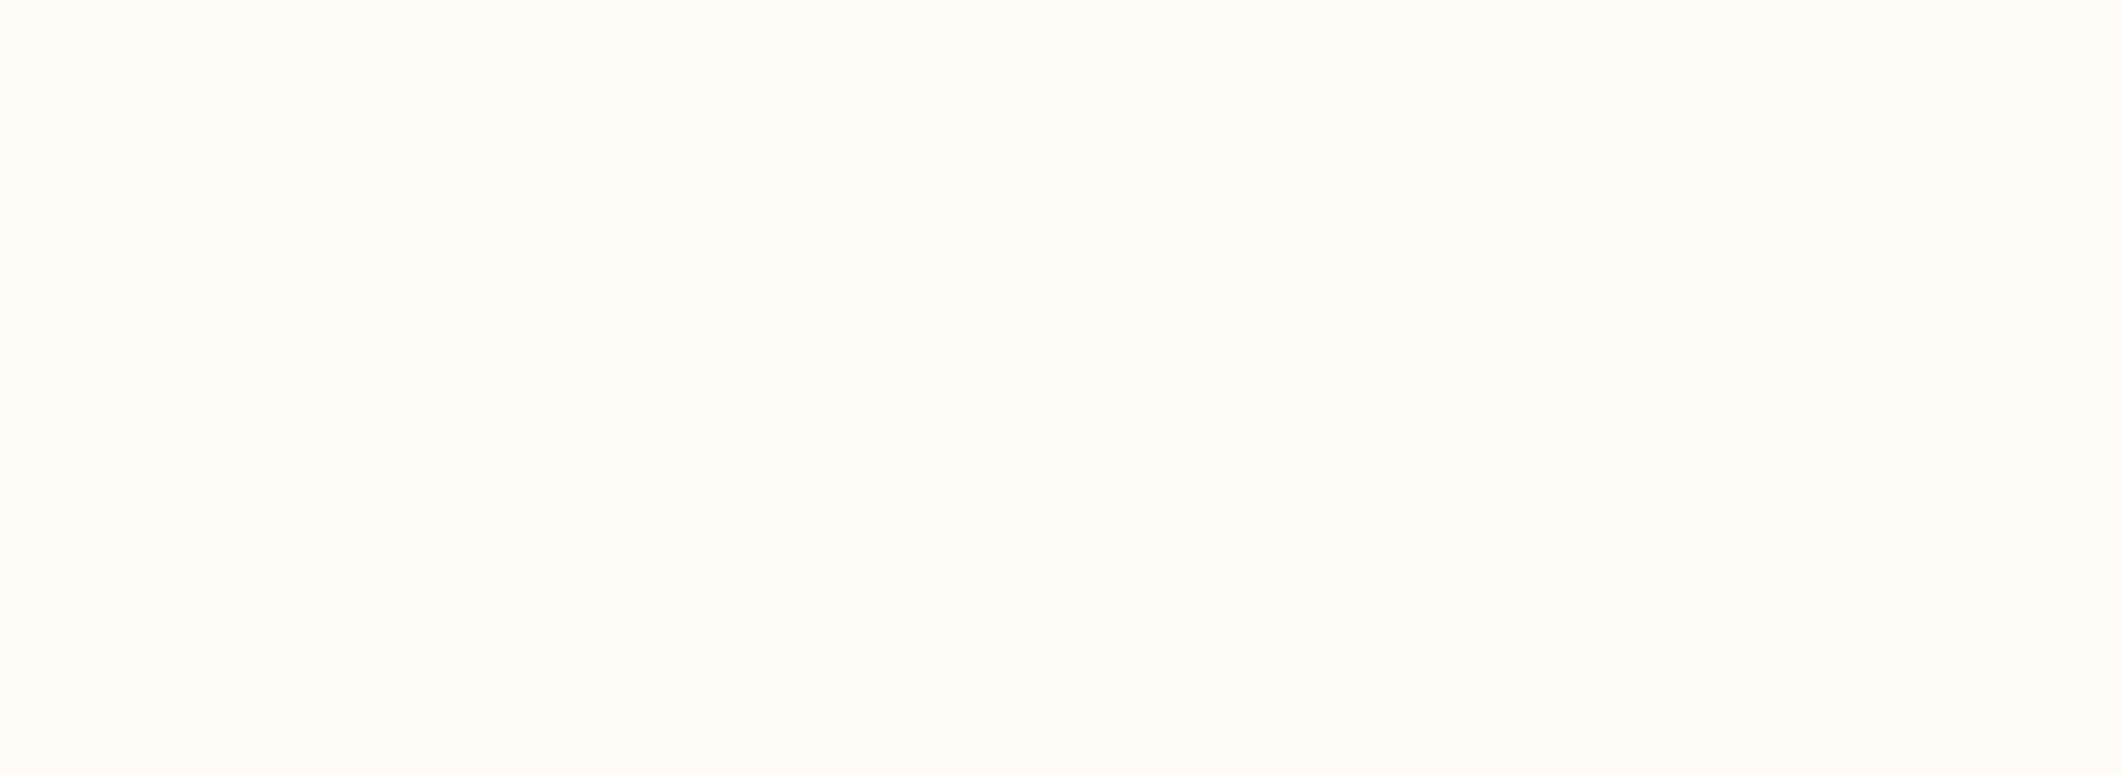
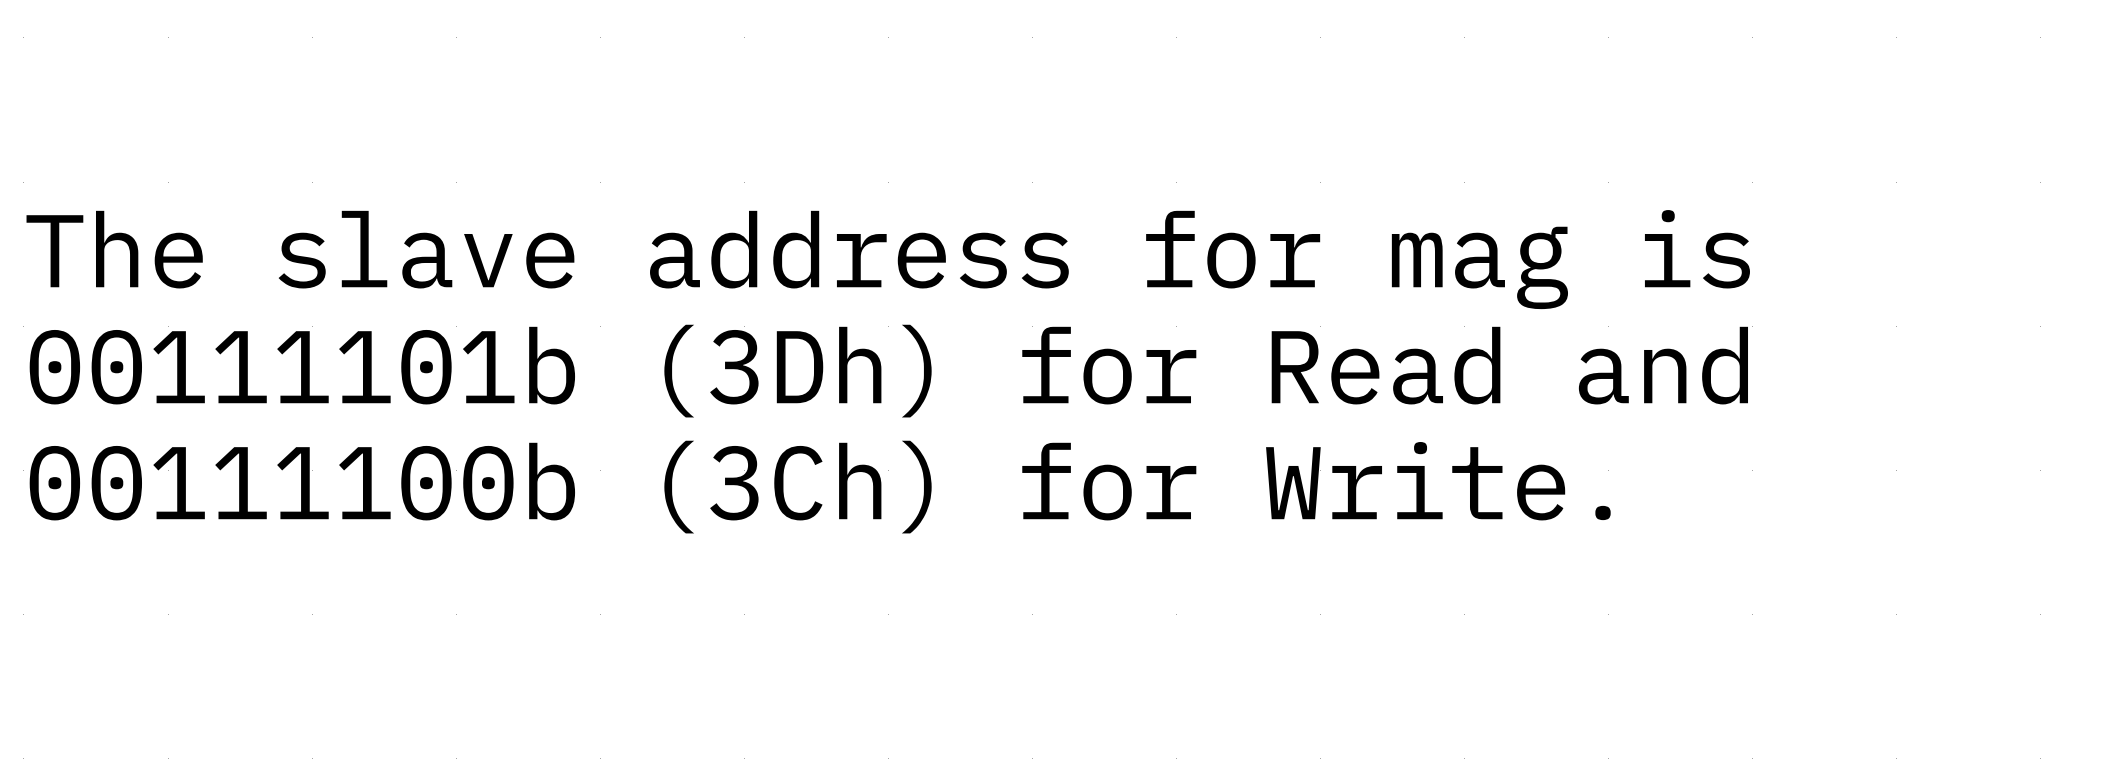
text: none -> The slave address for mag is (888, 259)
text: none -> 00111101b (3Dh) for Read and (888, 371)
text: none -> 00111100b (3Ch) for Write. (820, 487)

